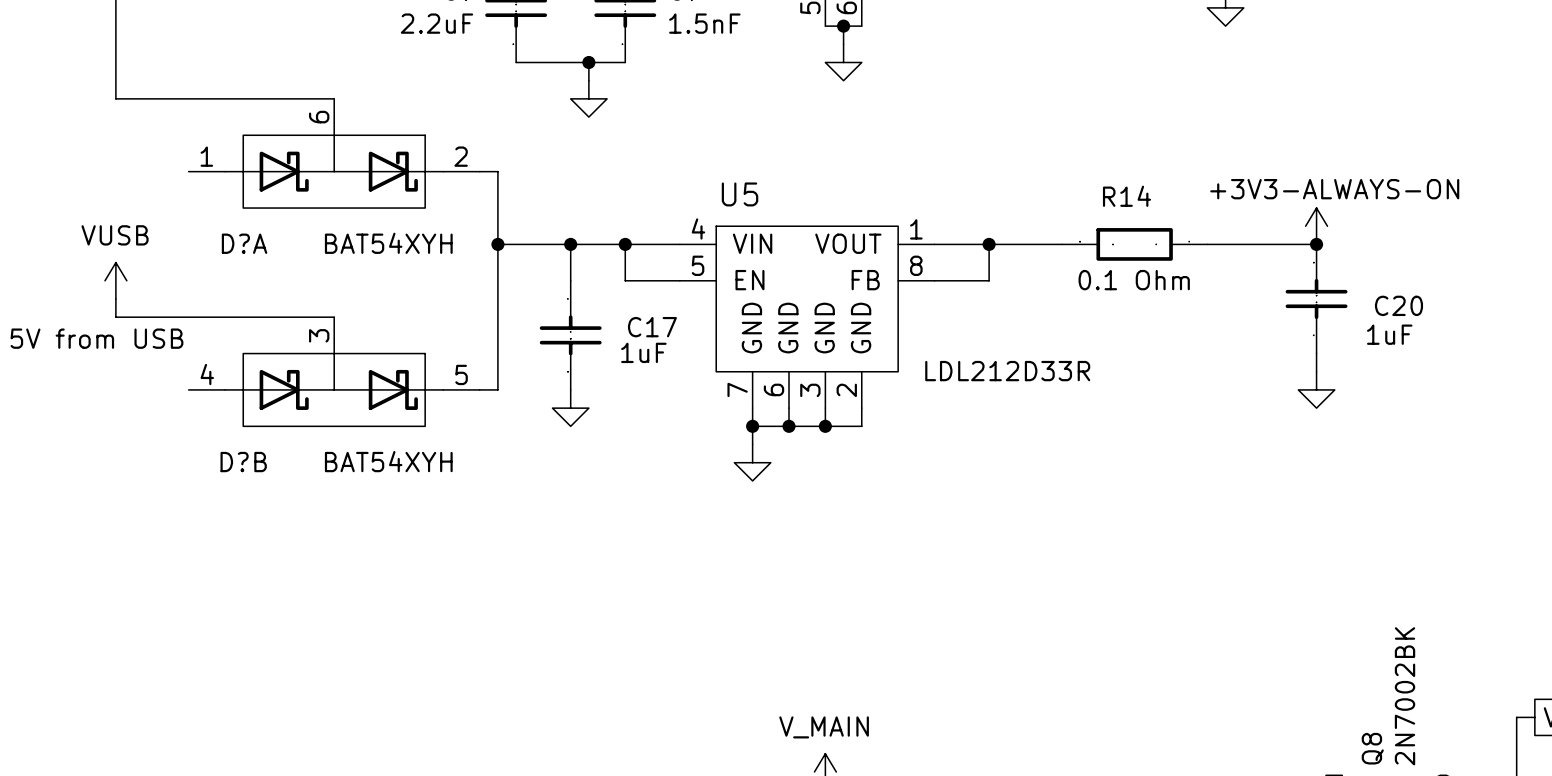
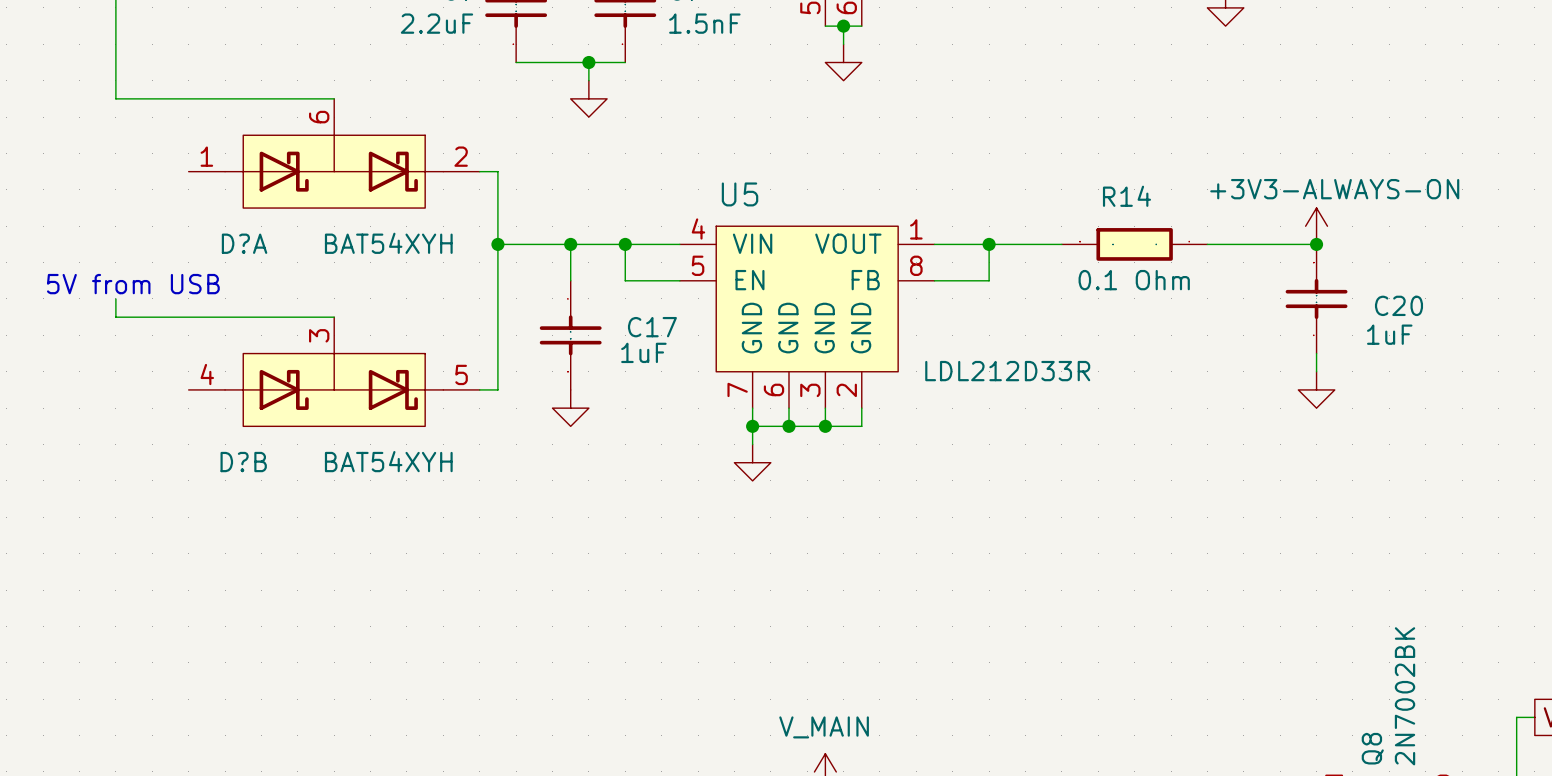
power symbol: VUSB (115, 280) -> none
text position: 5V from USB (96, 338) -> 5V from USB (133, 284)

